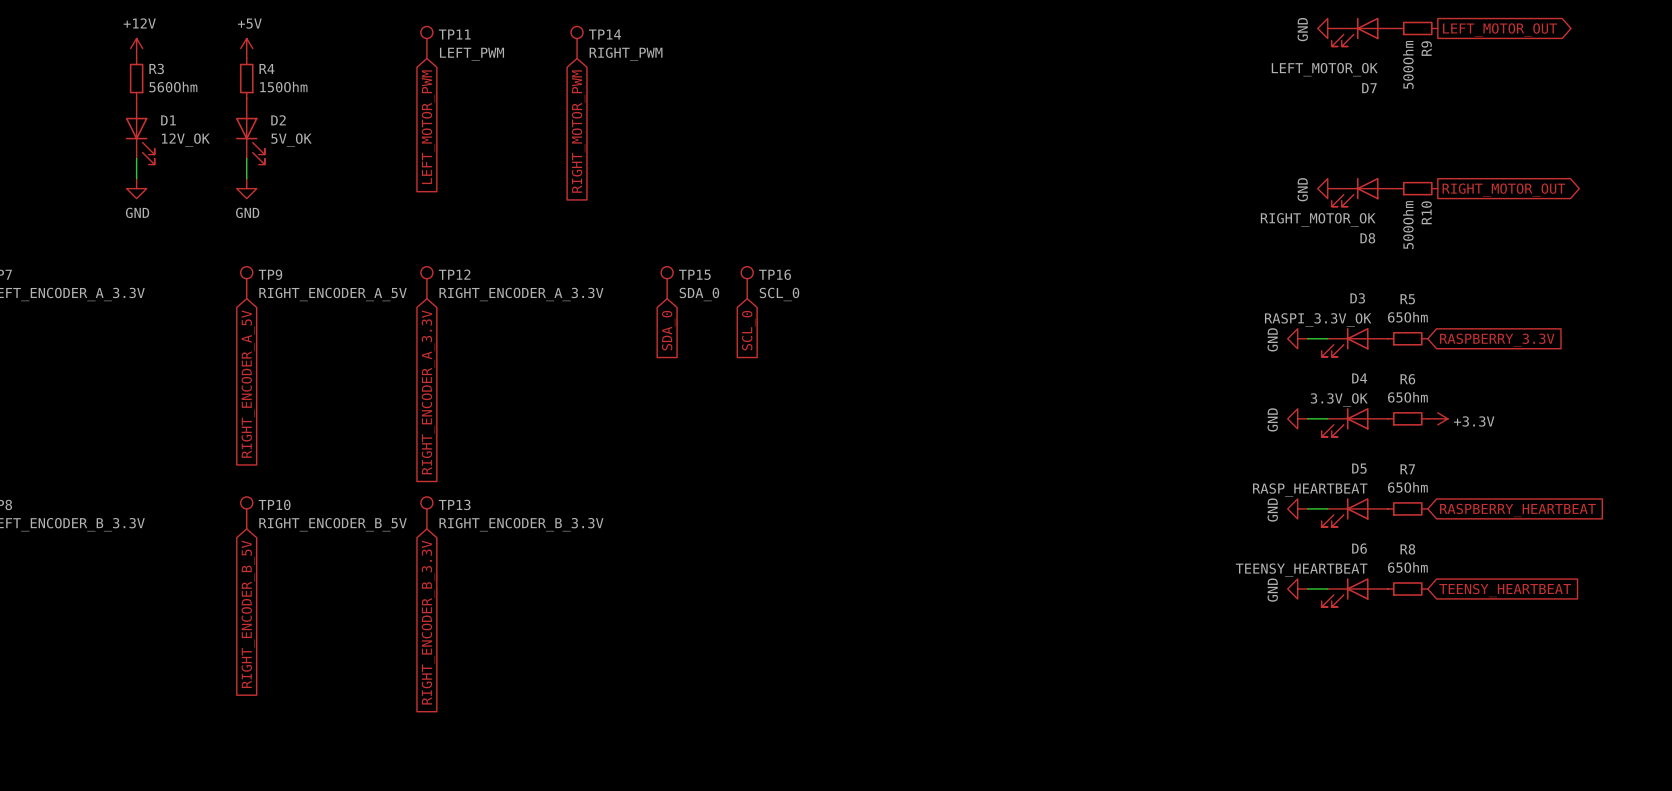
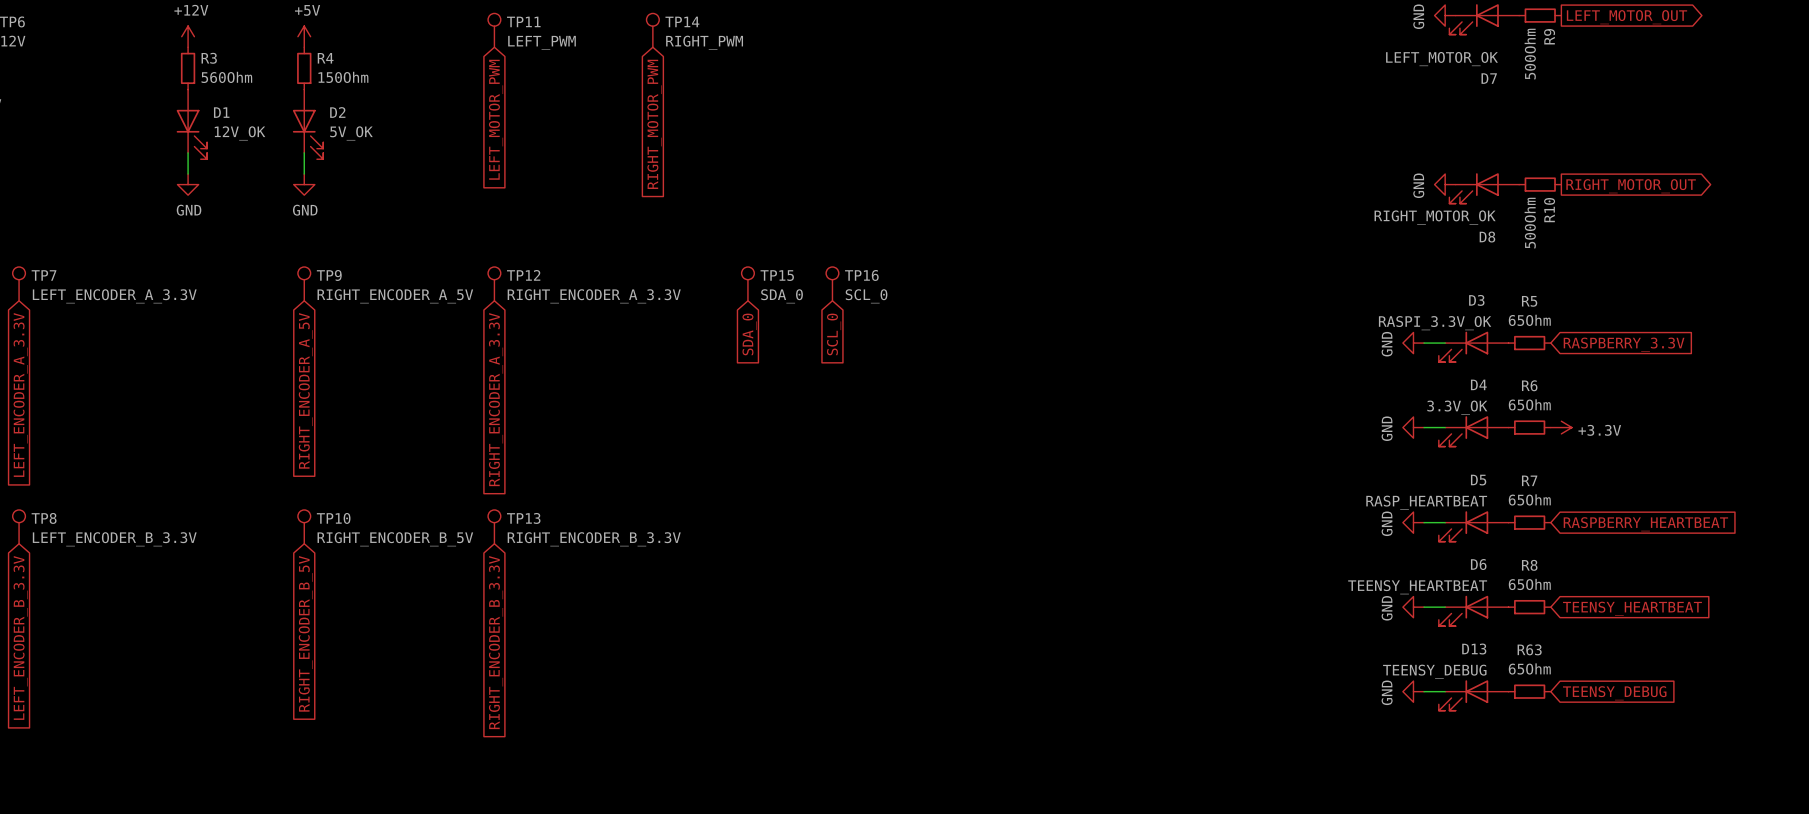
power symbol: none -> GND (1413, 691)
wire: none -> (1424, 691) (1445, 691)
R63: none -> 65Ohm (1529, 691)
global label: none -> TEENSY_DEBUG (1614, 693)
D13: none -> TEENSY_DEBUG (1473, 695)

